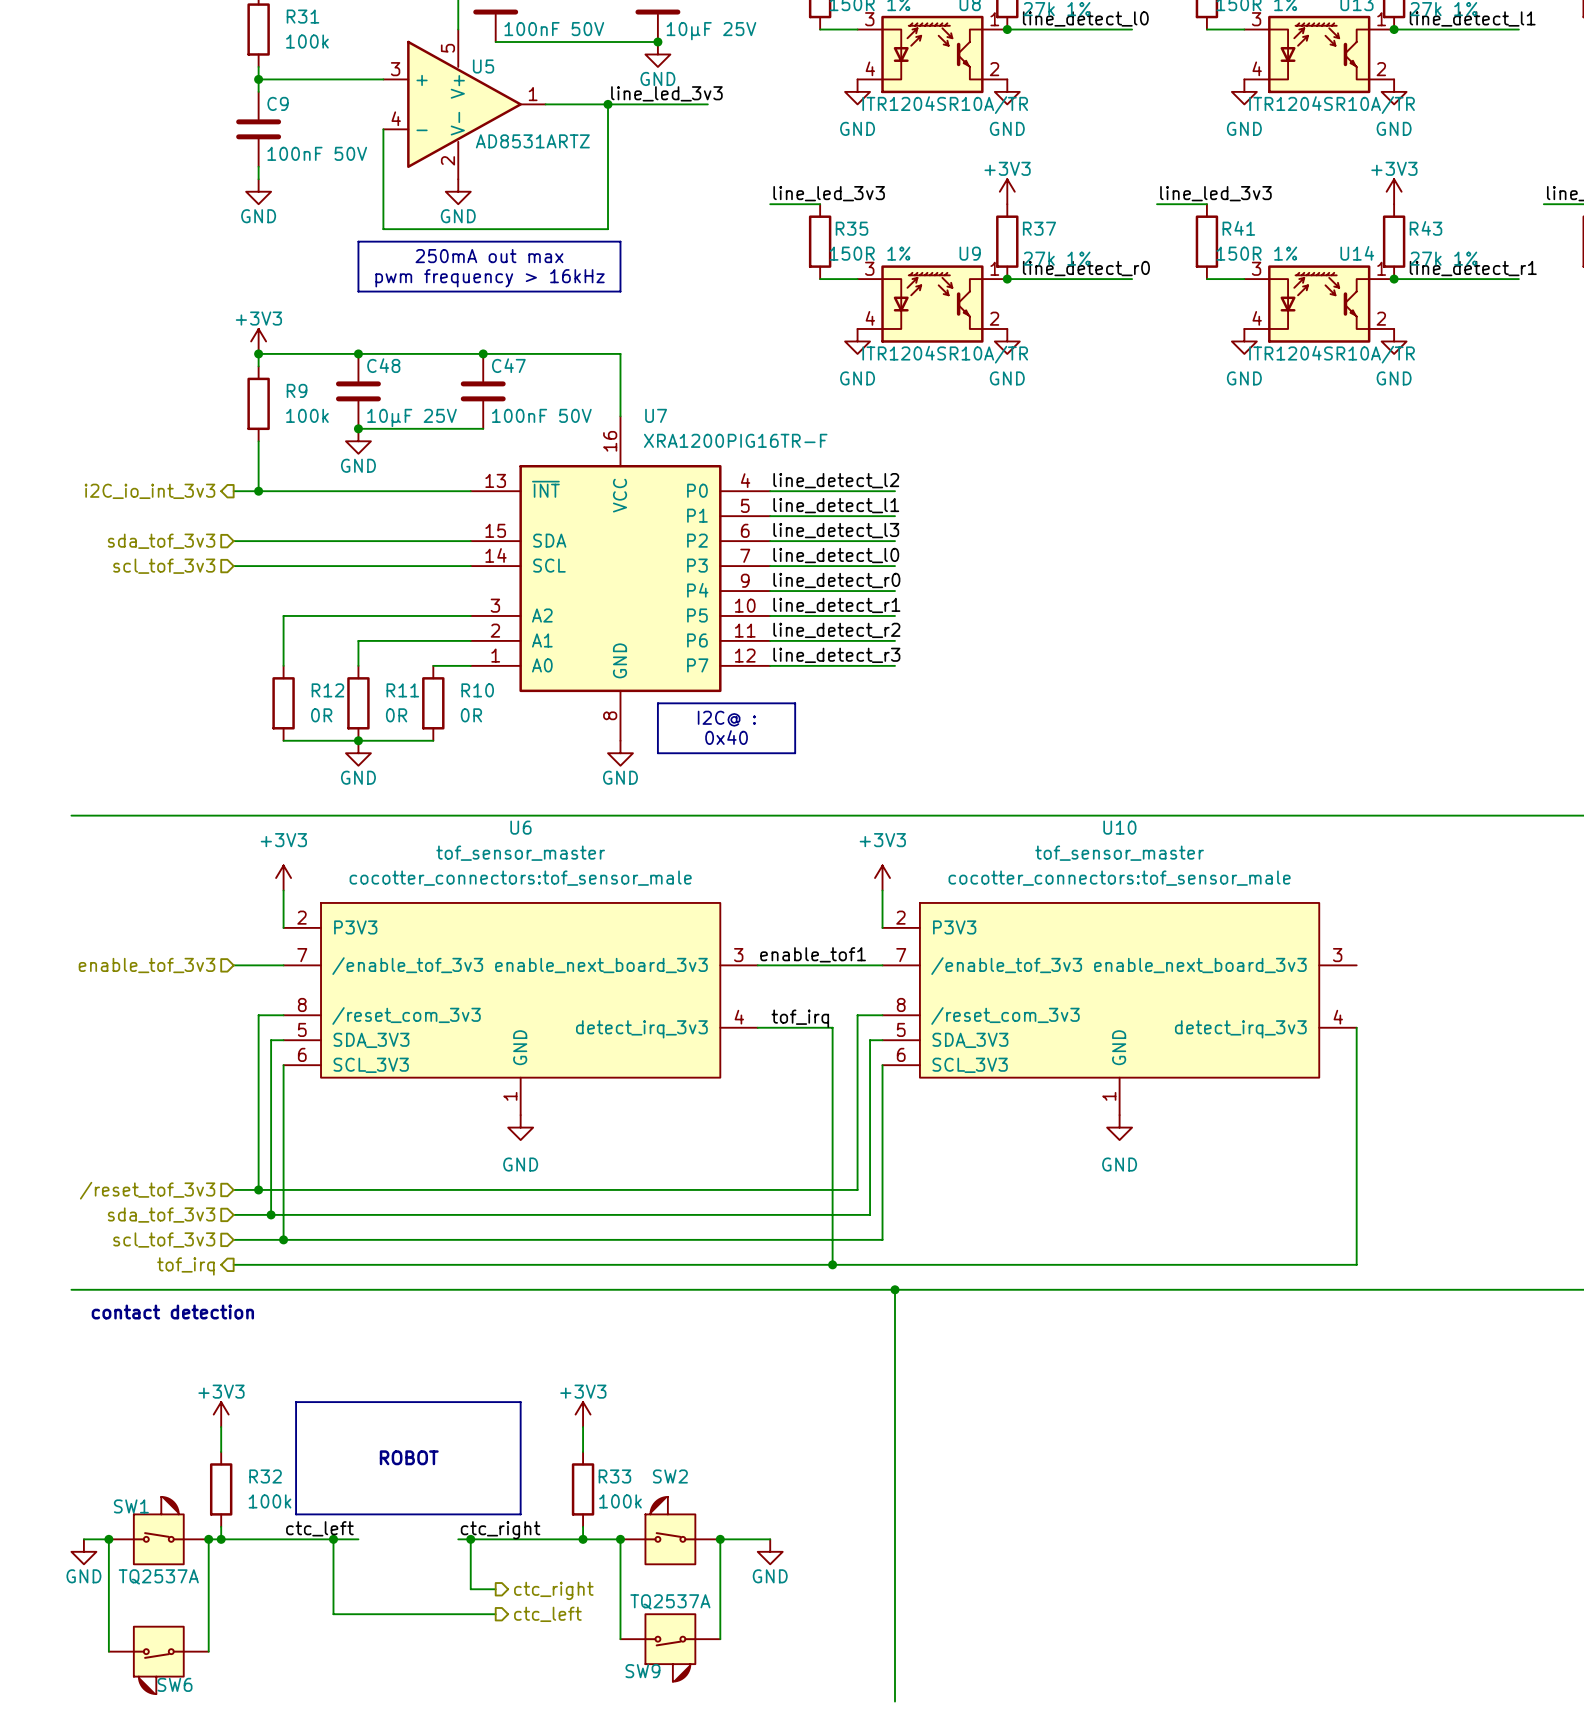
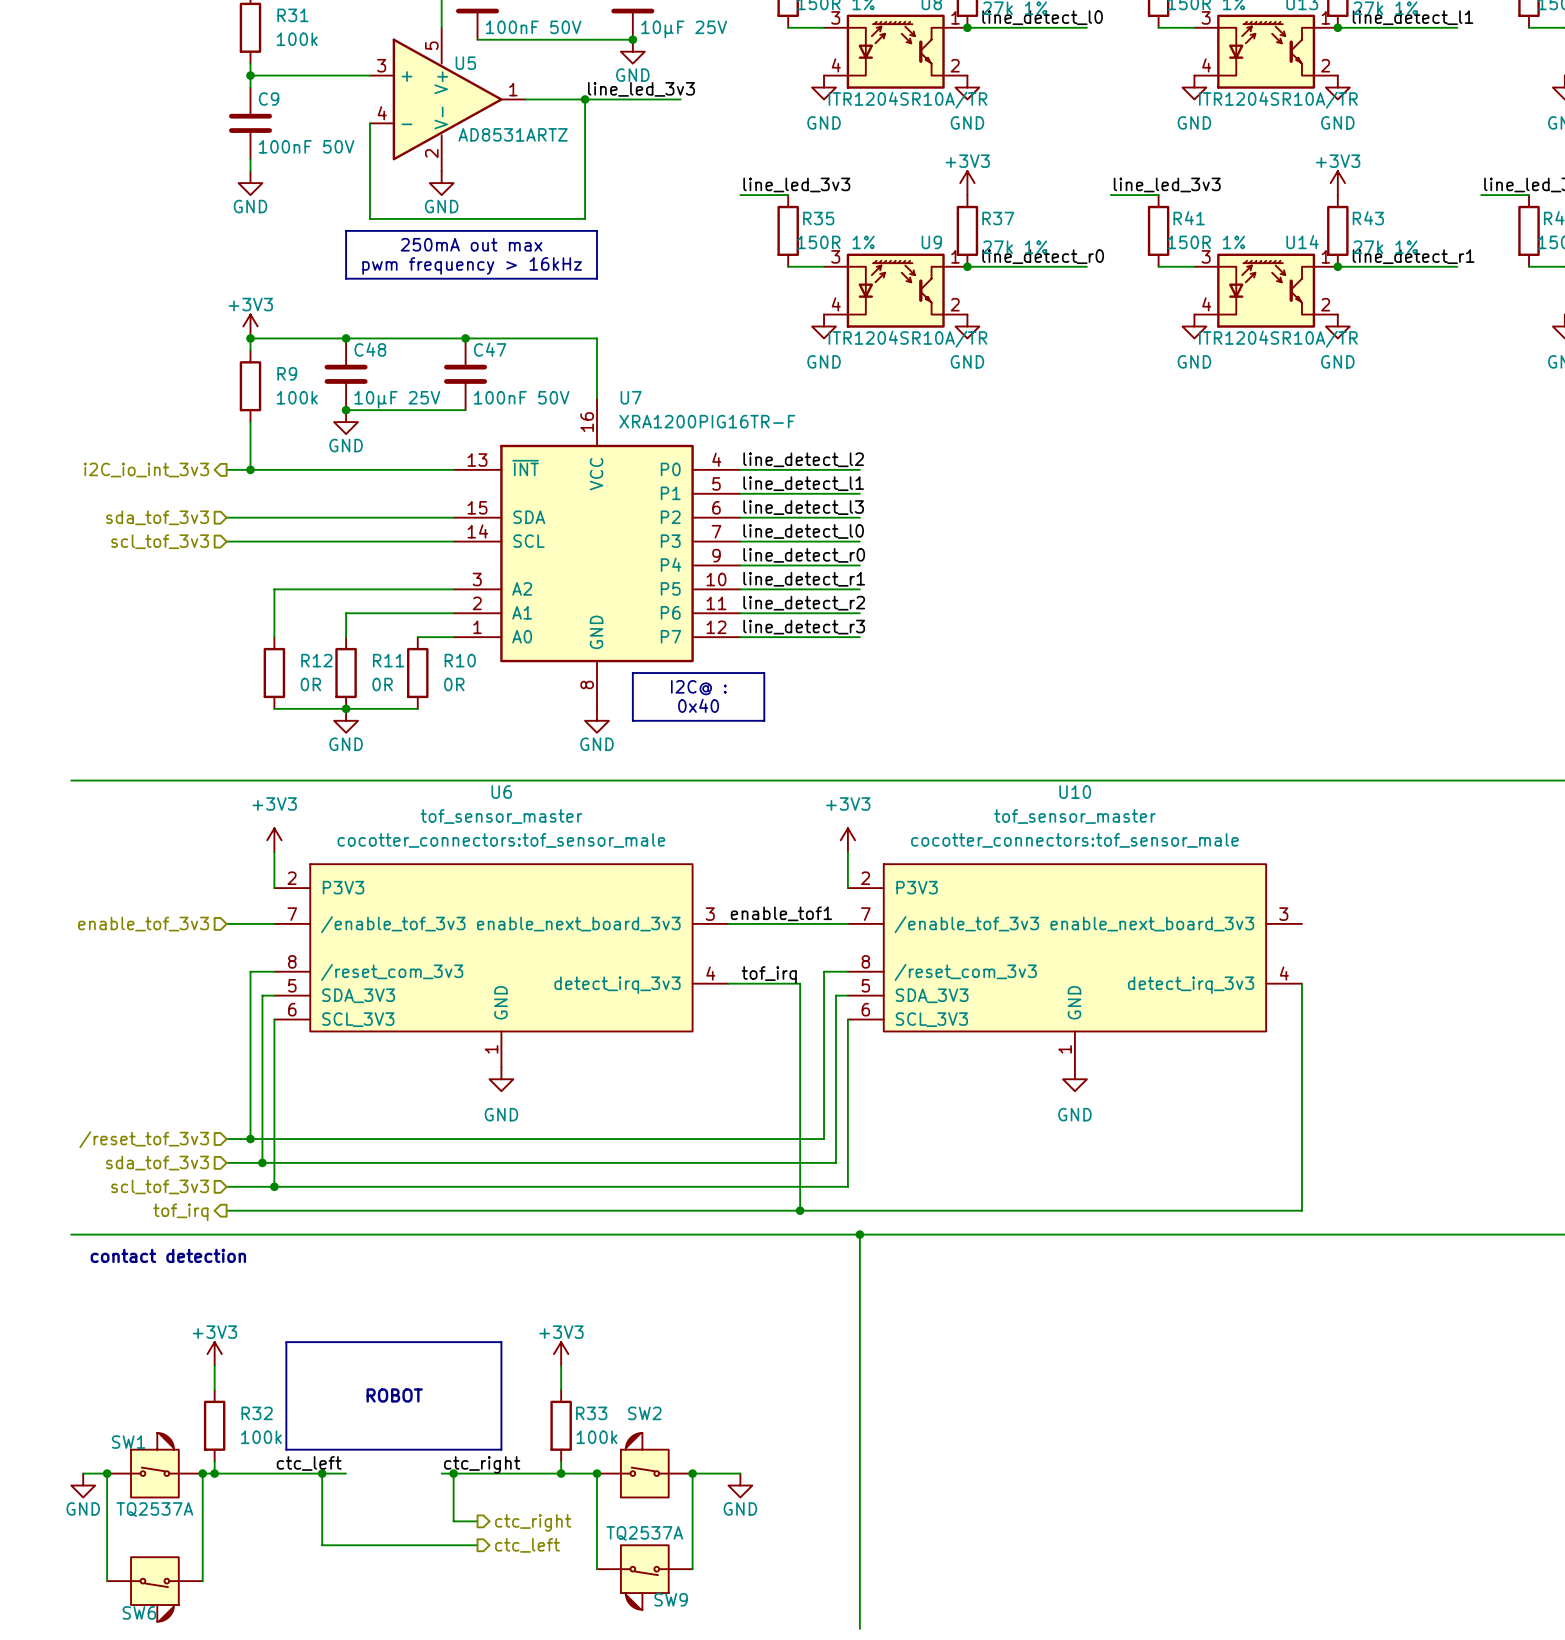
SW9 flip: as is (670, 1647) -> left-right (644, 1577)
SW6 flip: as is (158, 1660) -> left-right (154, 1589)

